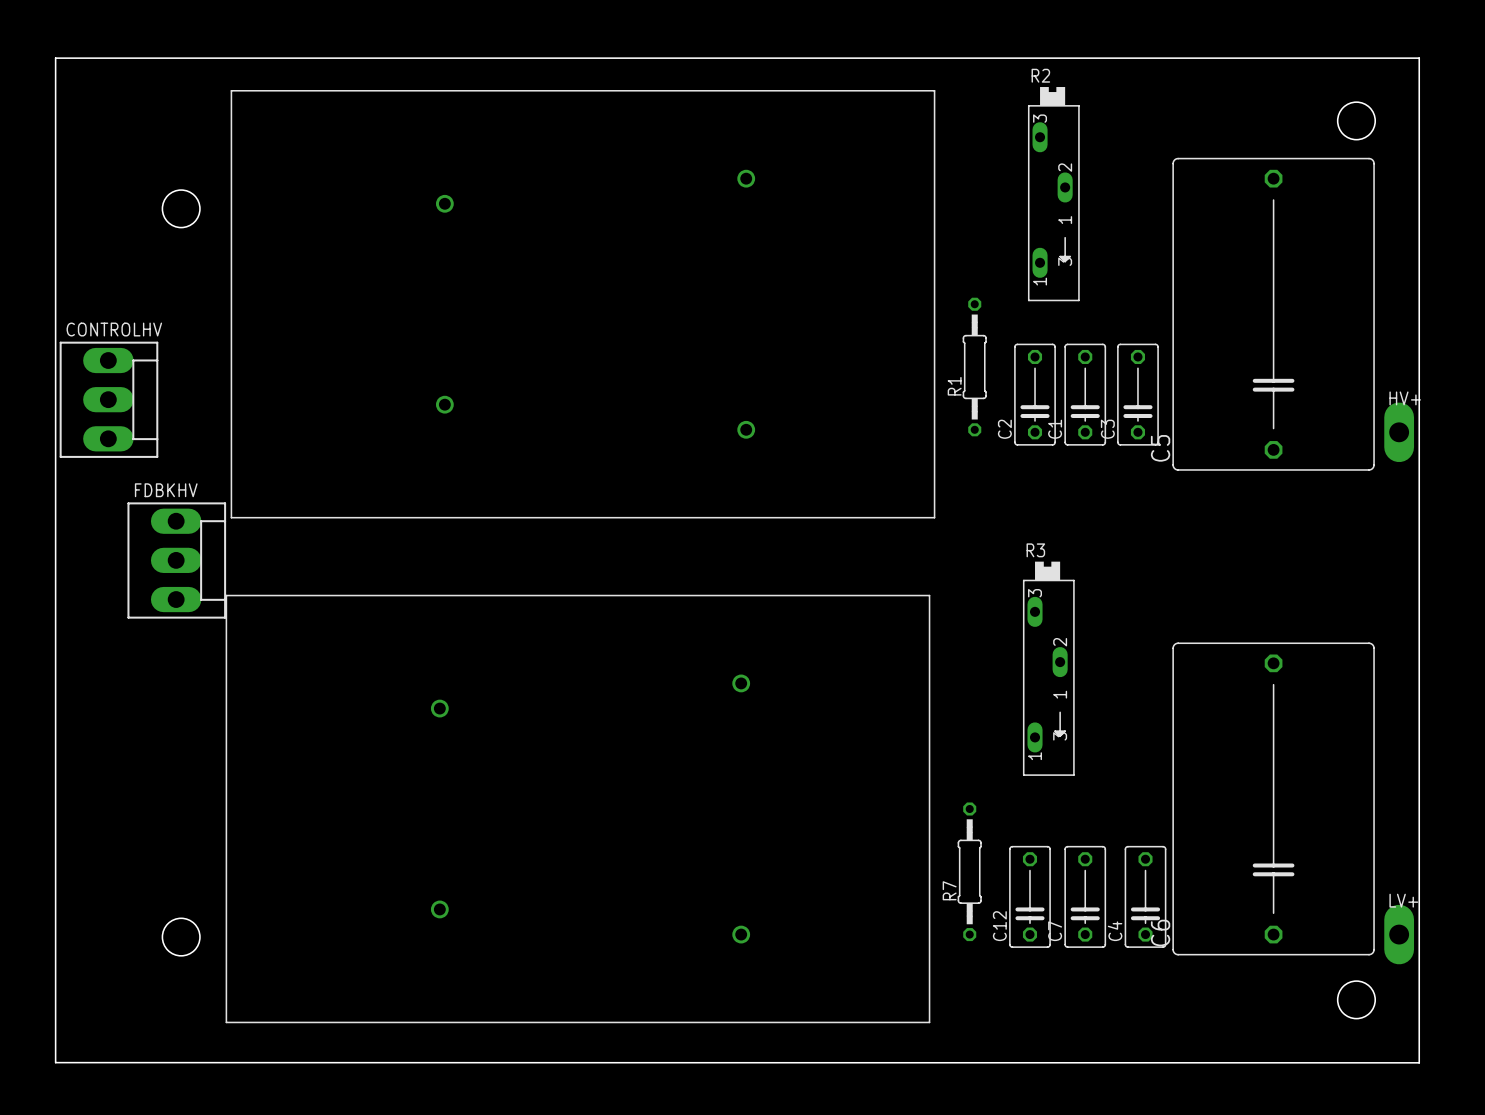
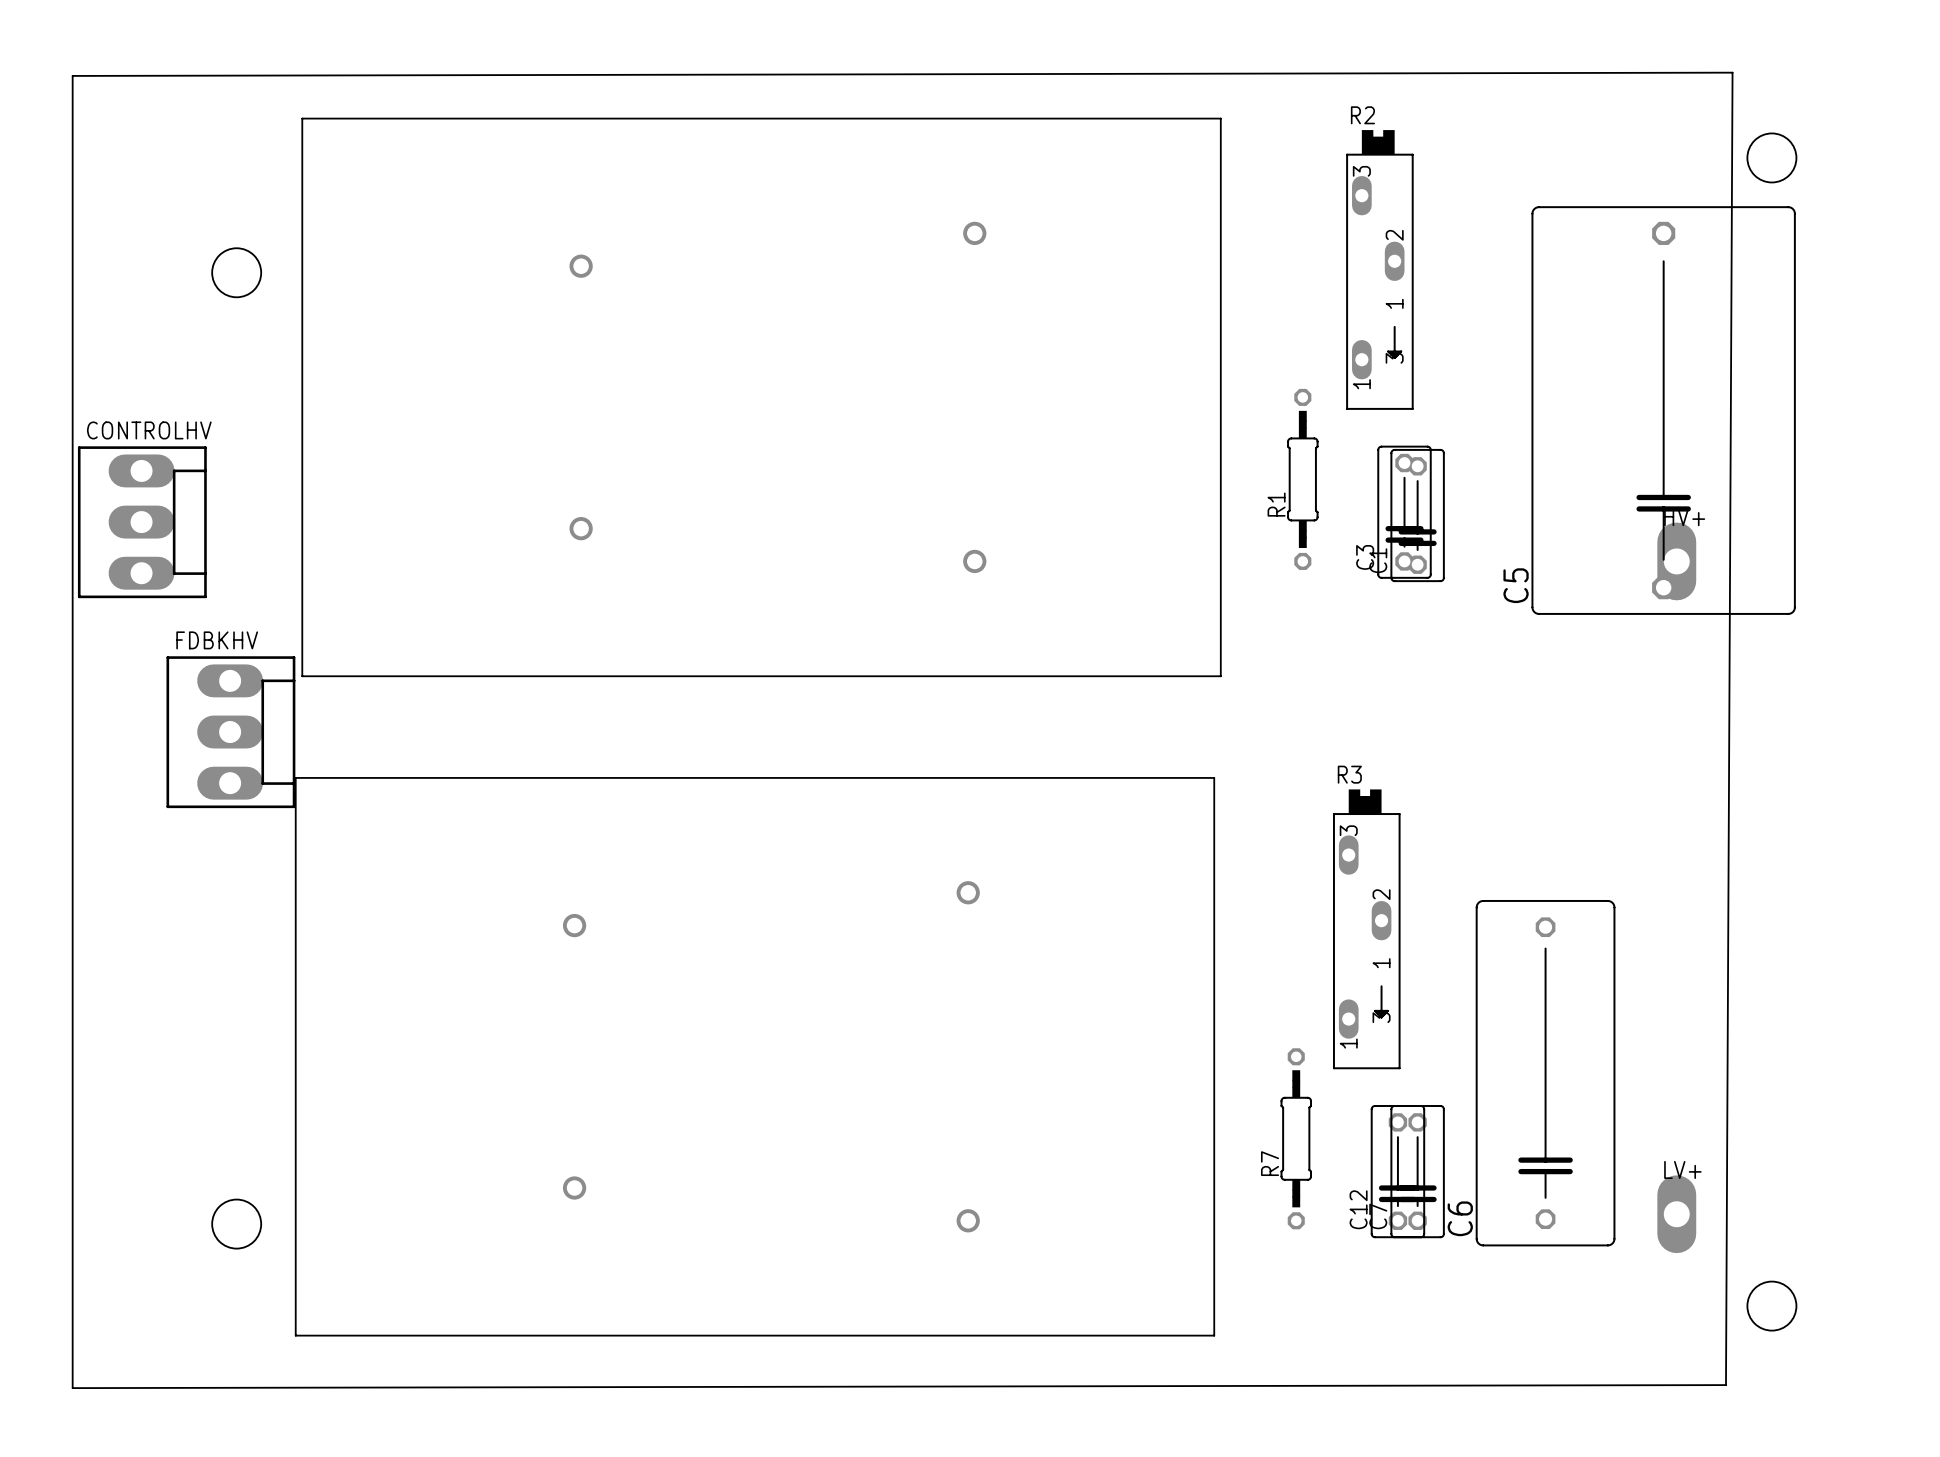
board edge: (55, 58) (1419, 58) (1419, 1062) (55, 1062) -> (72, 75) (1732, 72) (1725, 1385) (72, 1388)
R2 position: (1053, 194) -> (1379, 269)
R1 position: (974, 367) -> (1302, 479)
C2: (1035, 394) -> none
C3 position: (1137, 394) -> (1404, 512)
HV+ position: (1399, 432) -> (1676, 561)
C6 footprint: [1172, 642, 1375, 956] -> [1475, 899, 1616, 1247]
R3 position: (1048, 668) -> (1366, 929)
R7 position: (969, 871) -> (1296, 1138)
C12 position: (1029, 896) -> (1397, 1171)
C4: (1145, 896) -> none
C6 name position: C6 (1160, 933) -> C6 (1460, 1218)
LV+ position: (1399, 934) -> (1676, 1214)

